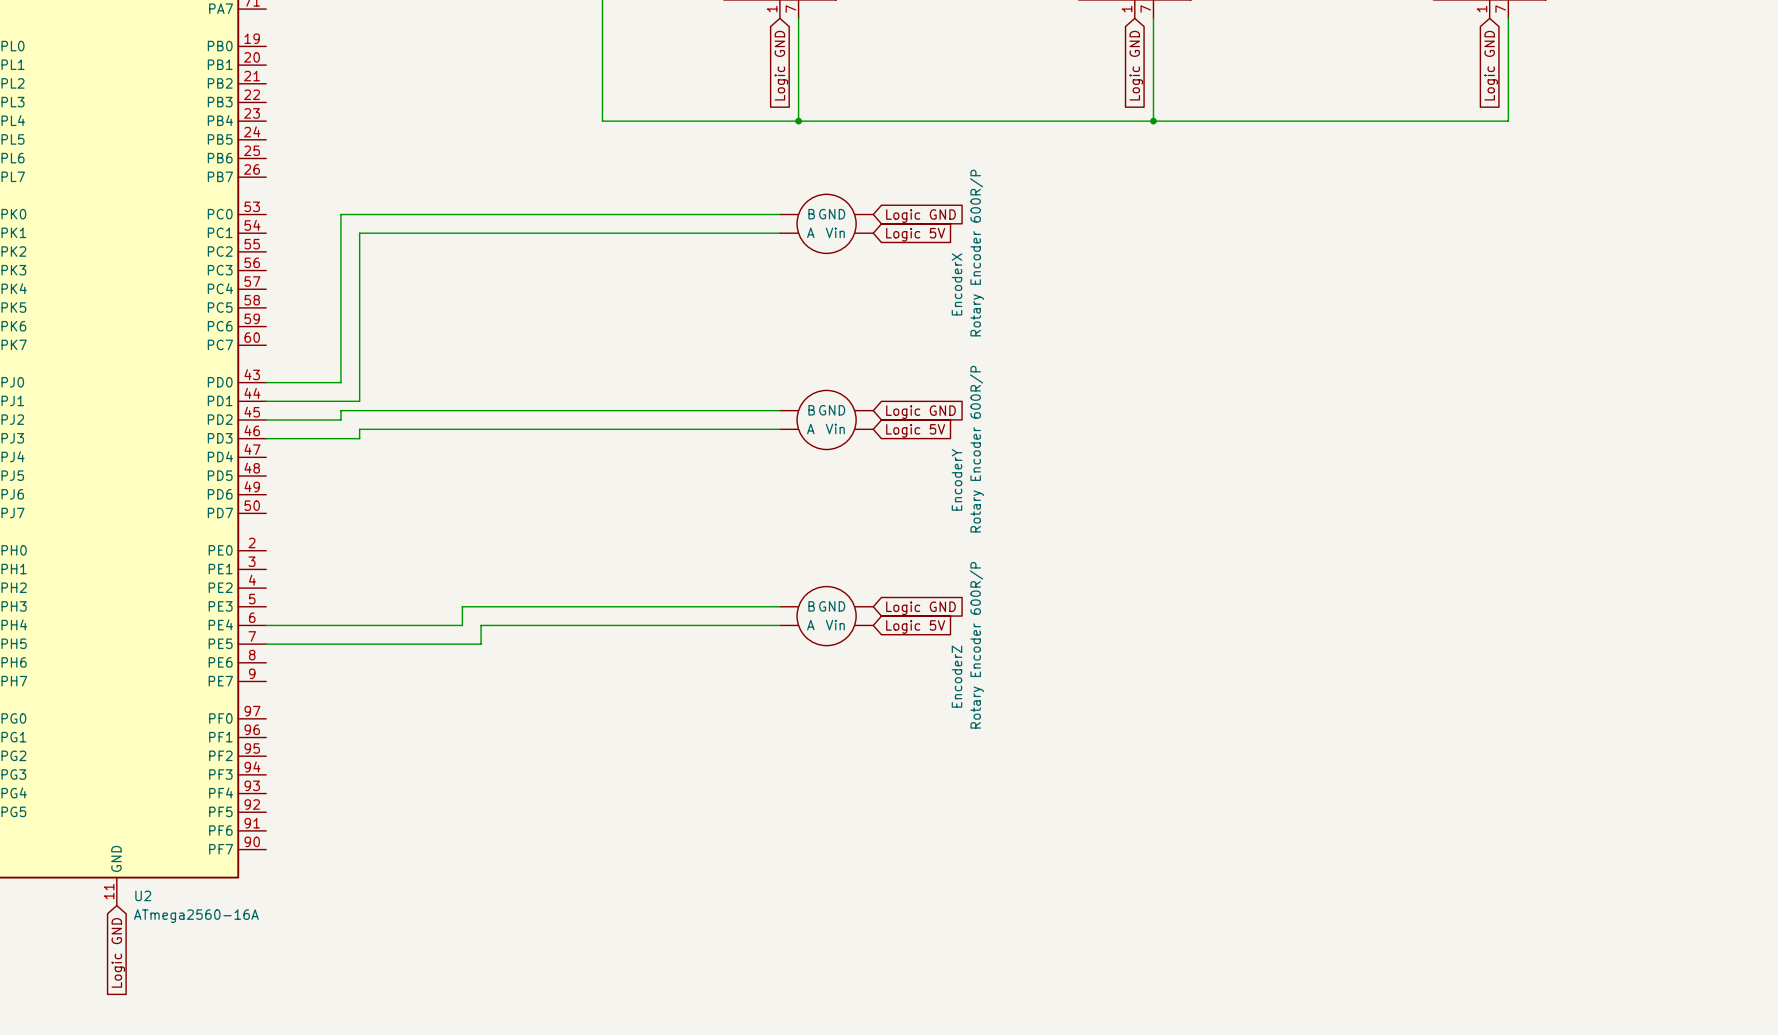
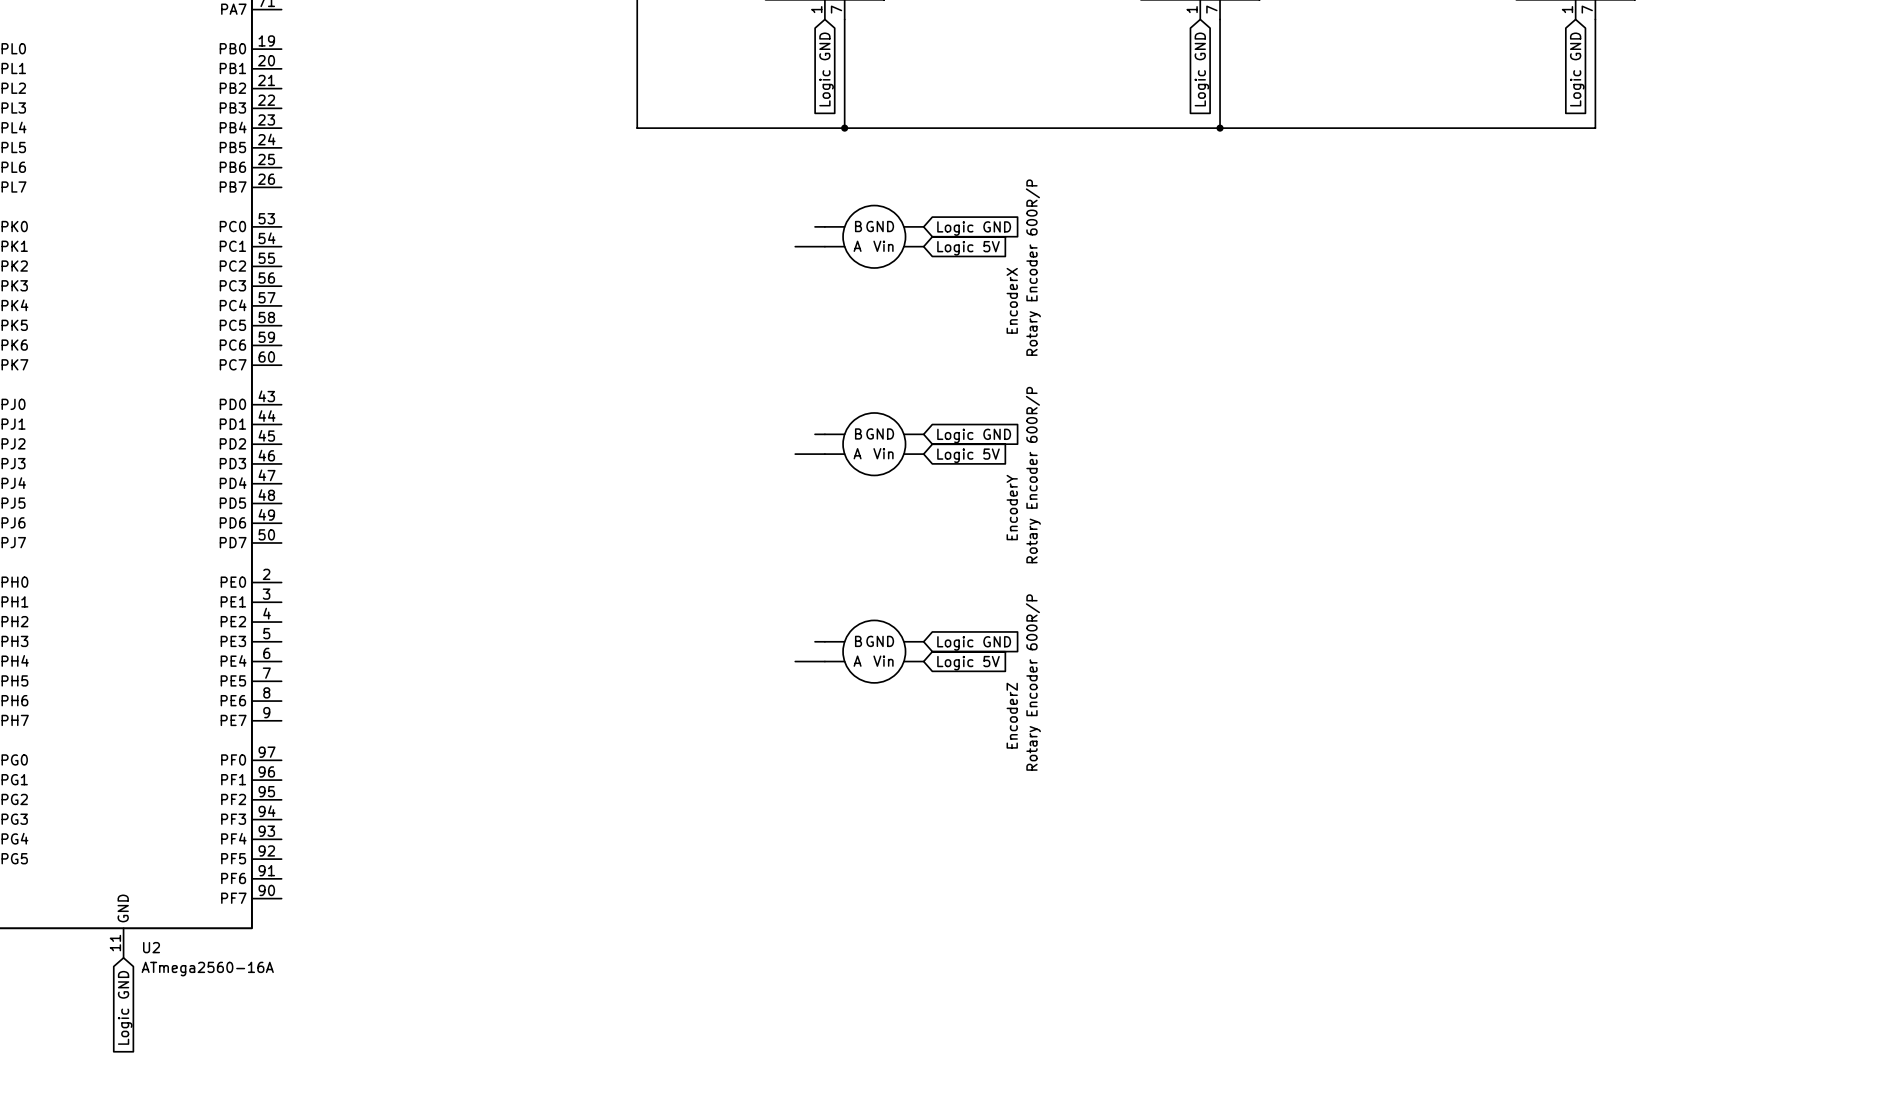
wire: (770, 214) (340, 214) (340, 382) (266, 382) -> none
wire: (751, 233) (359, 233) (359, 401) (266, 401) -> none
wire: (770, 410) (340, 410) (340, 419) (266, 419) -> none
wire: (751, 429) (359, 429) (359, 438) (266, 438) -> none
wire: (770, 606) (462, 606) (462, 625) (266, 625) -> none
wire: (751, 625) (481, 625) (481, 644) (266, 644) -> none

